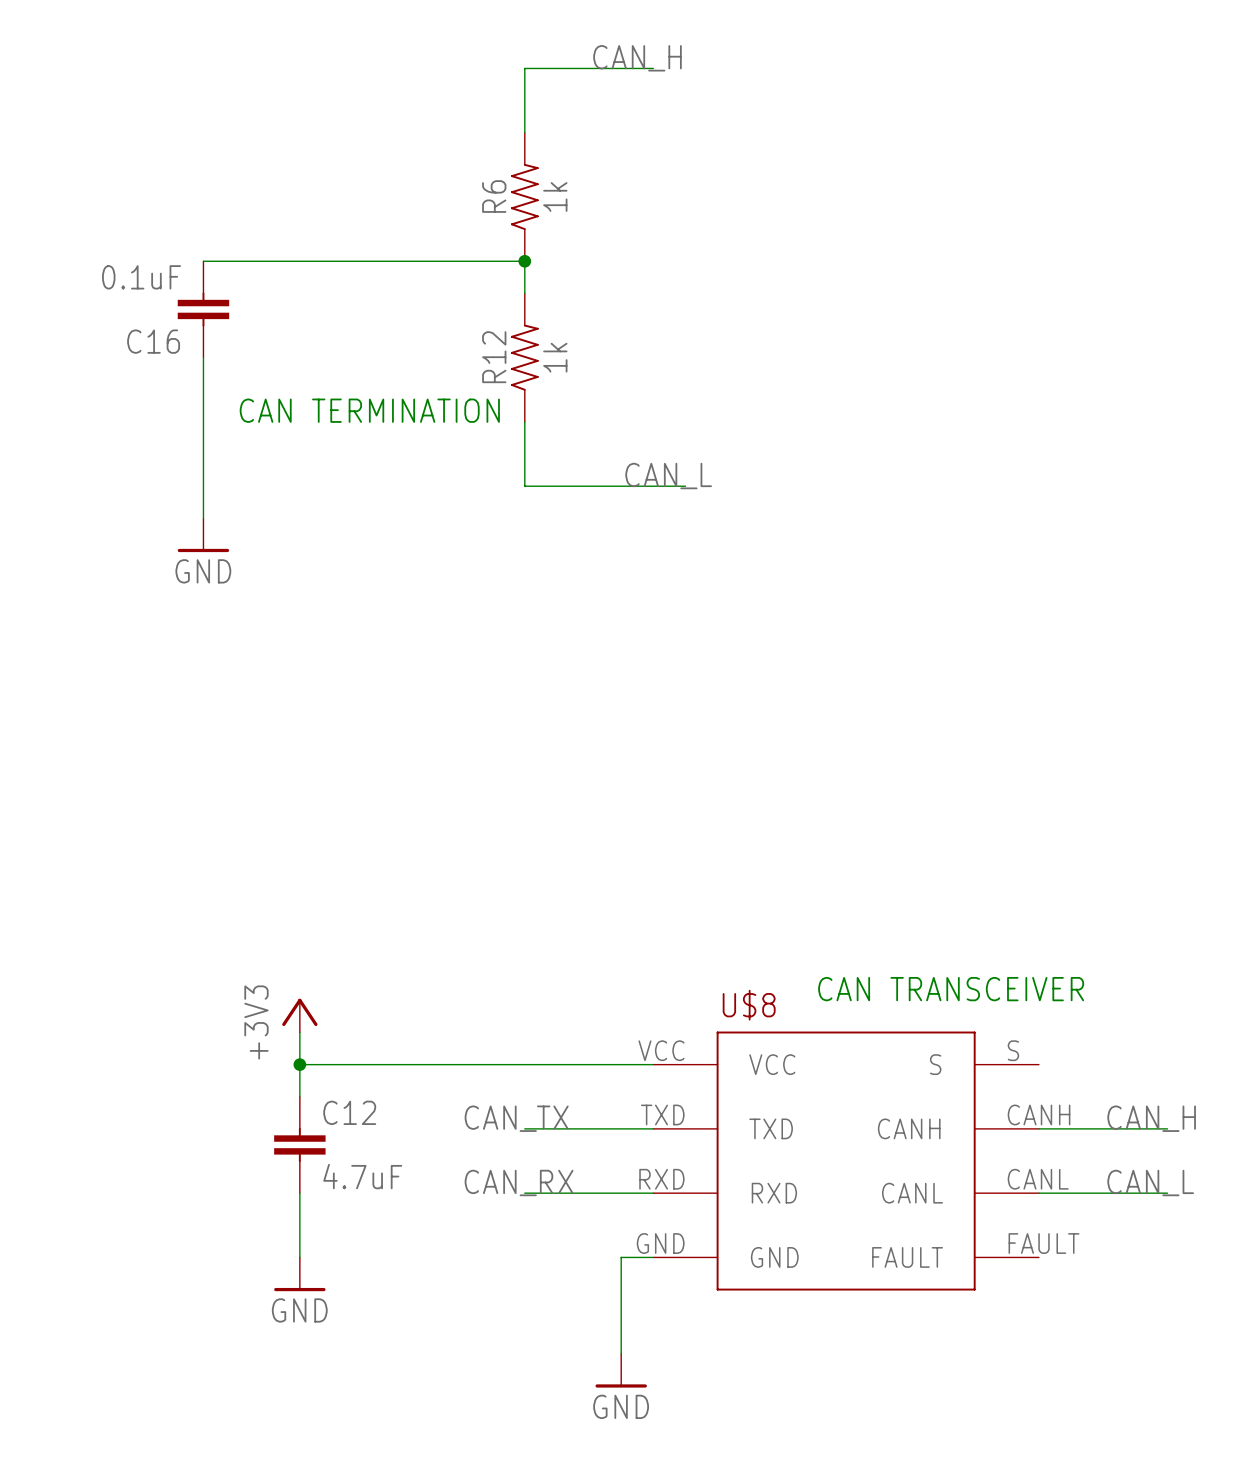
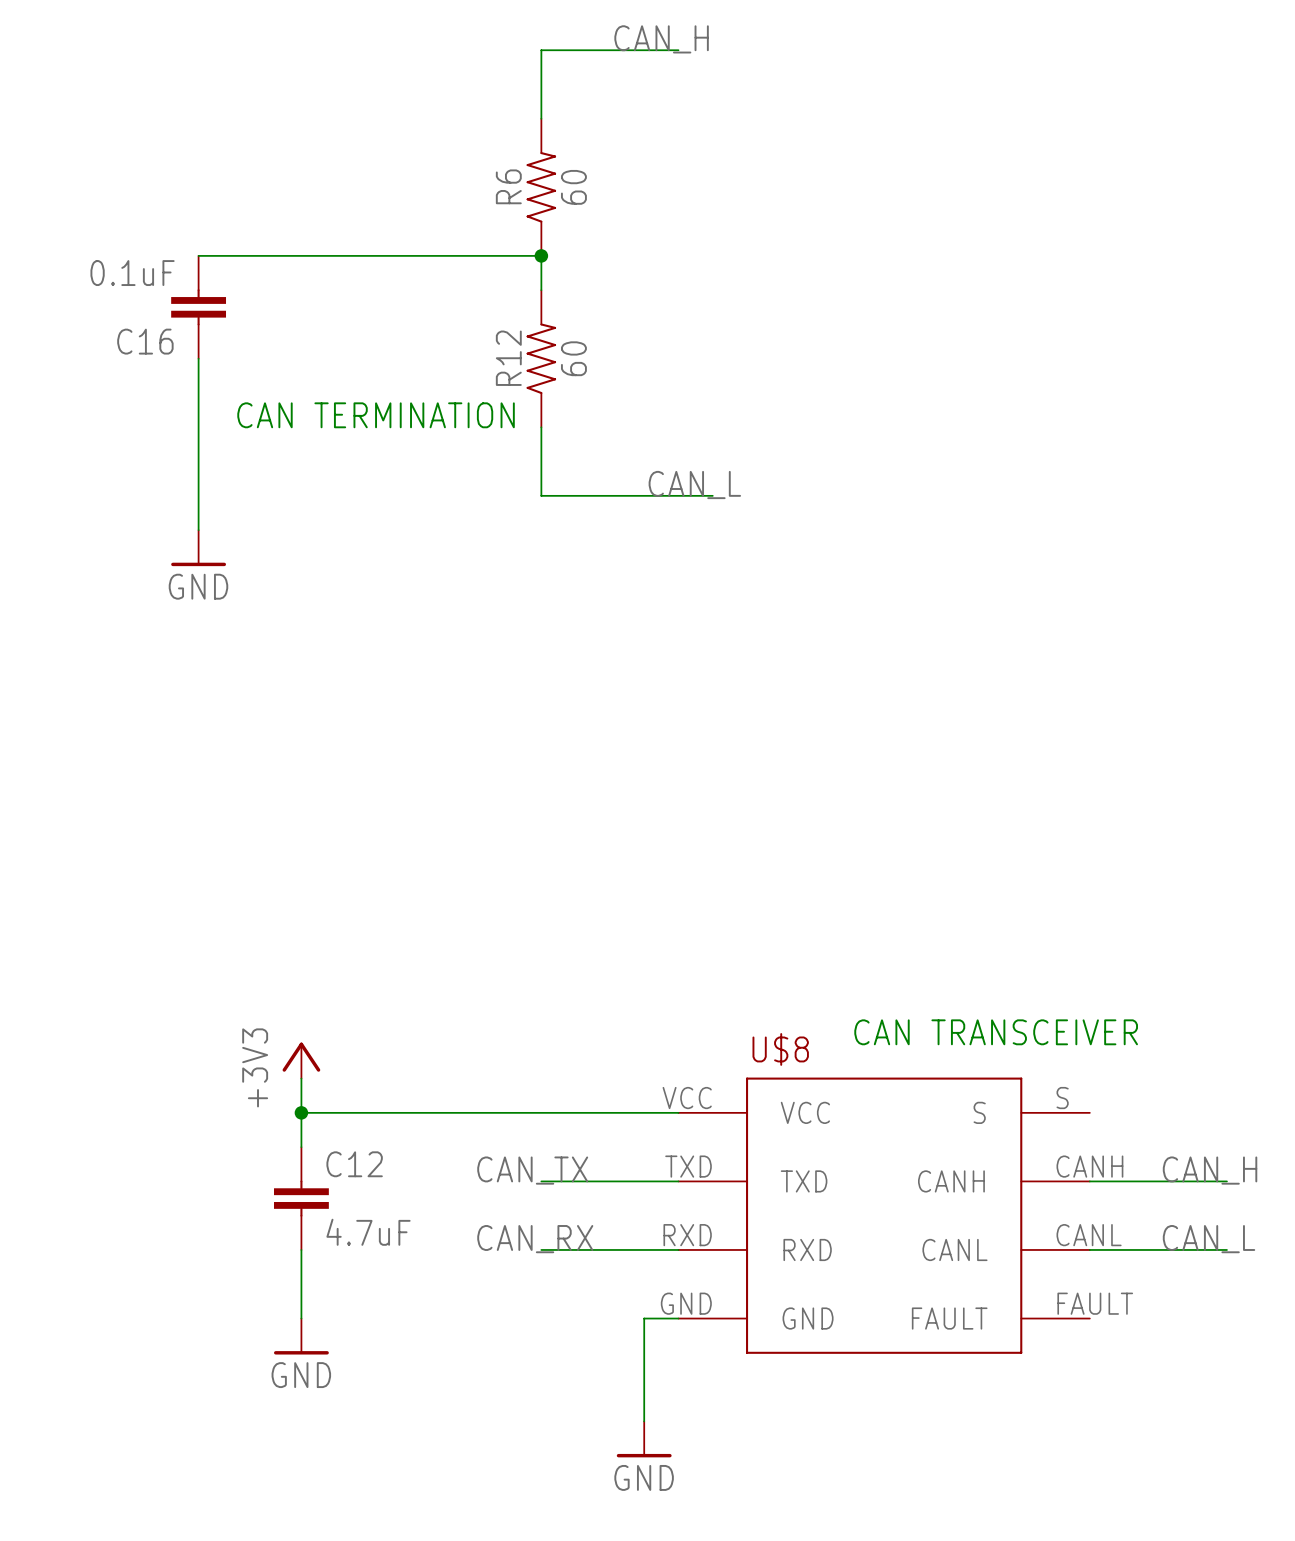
R6 value: 1k (555, 197) -> 60 (573, 187)
R12 value: 1k (555, 357) -> 60 (573, 358)

